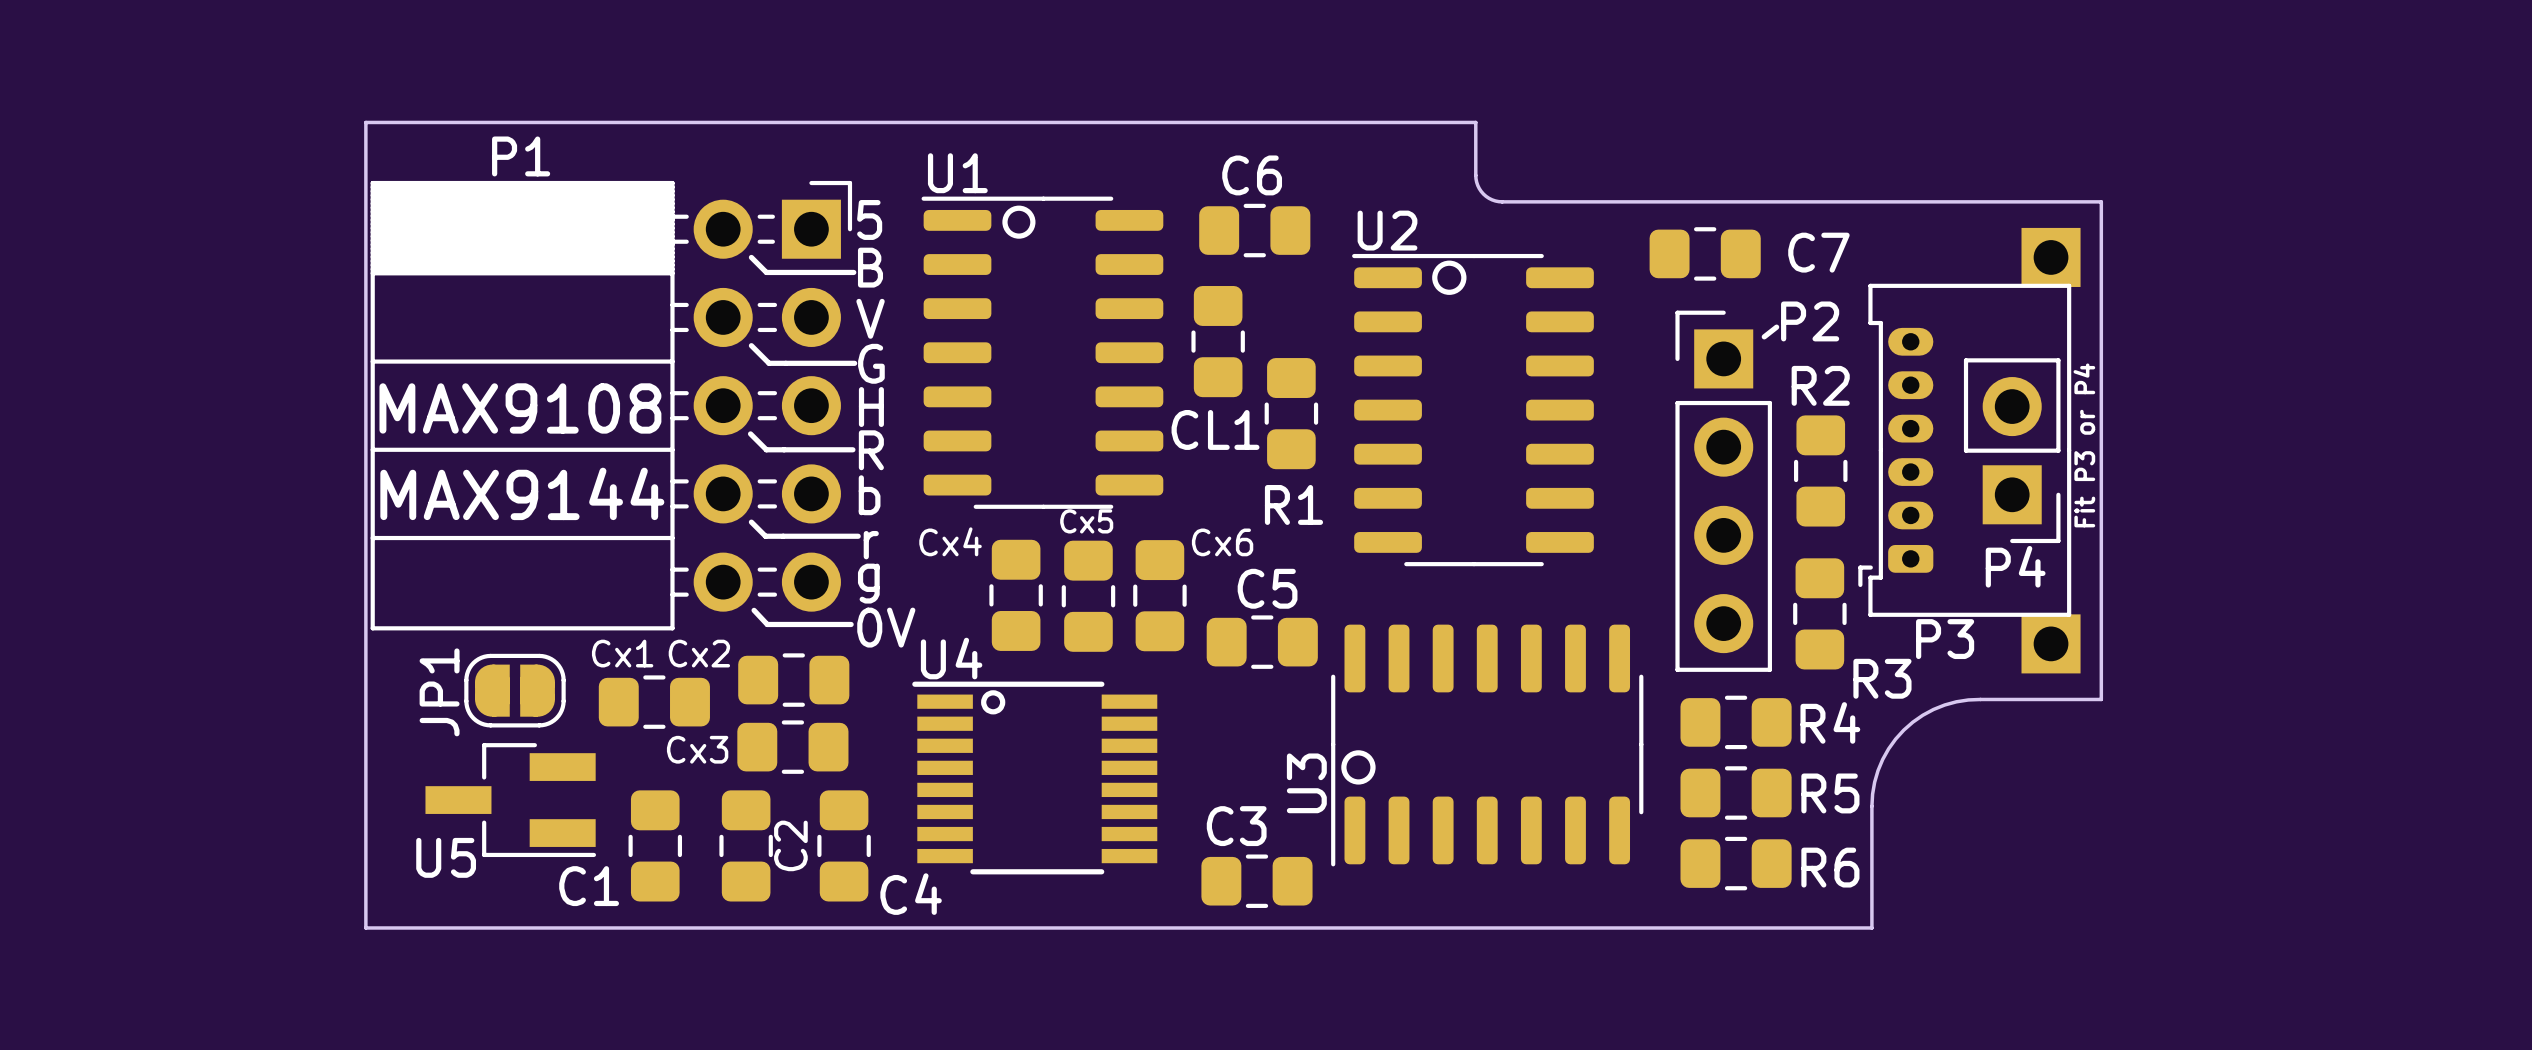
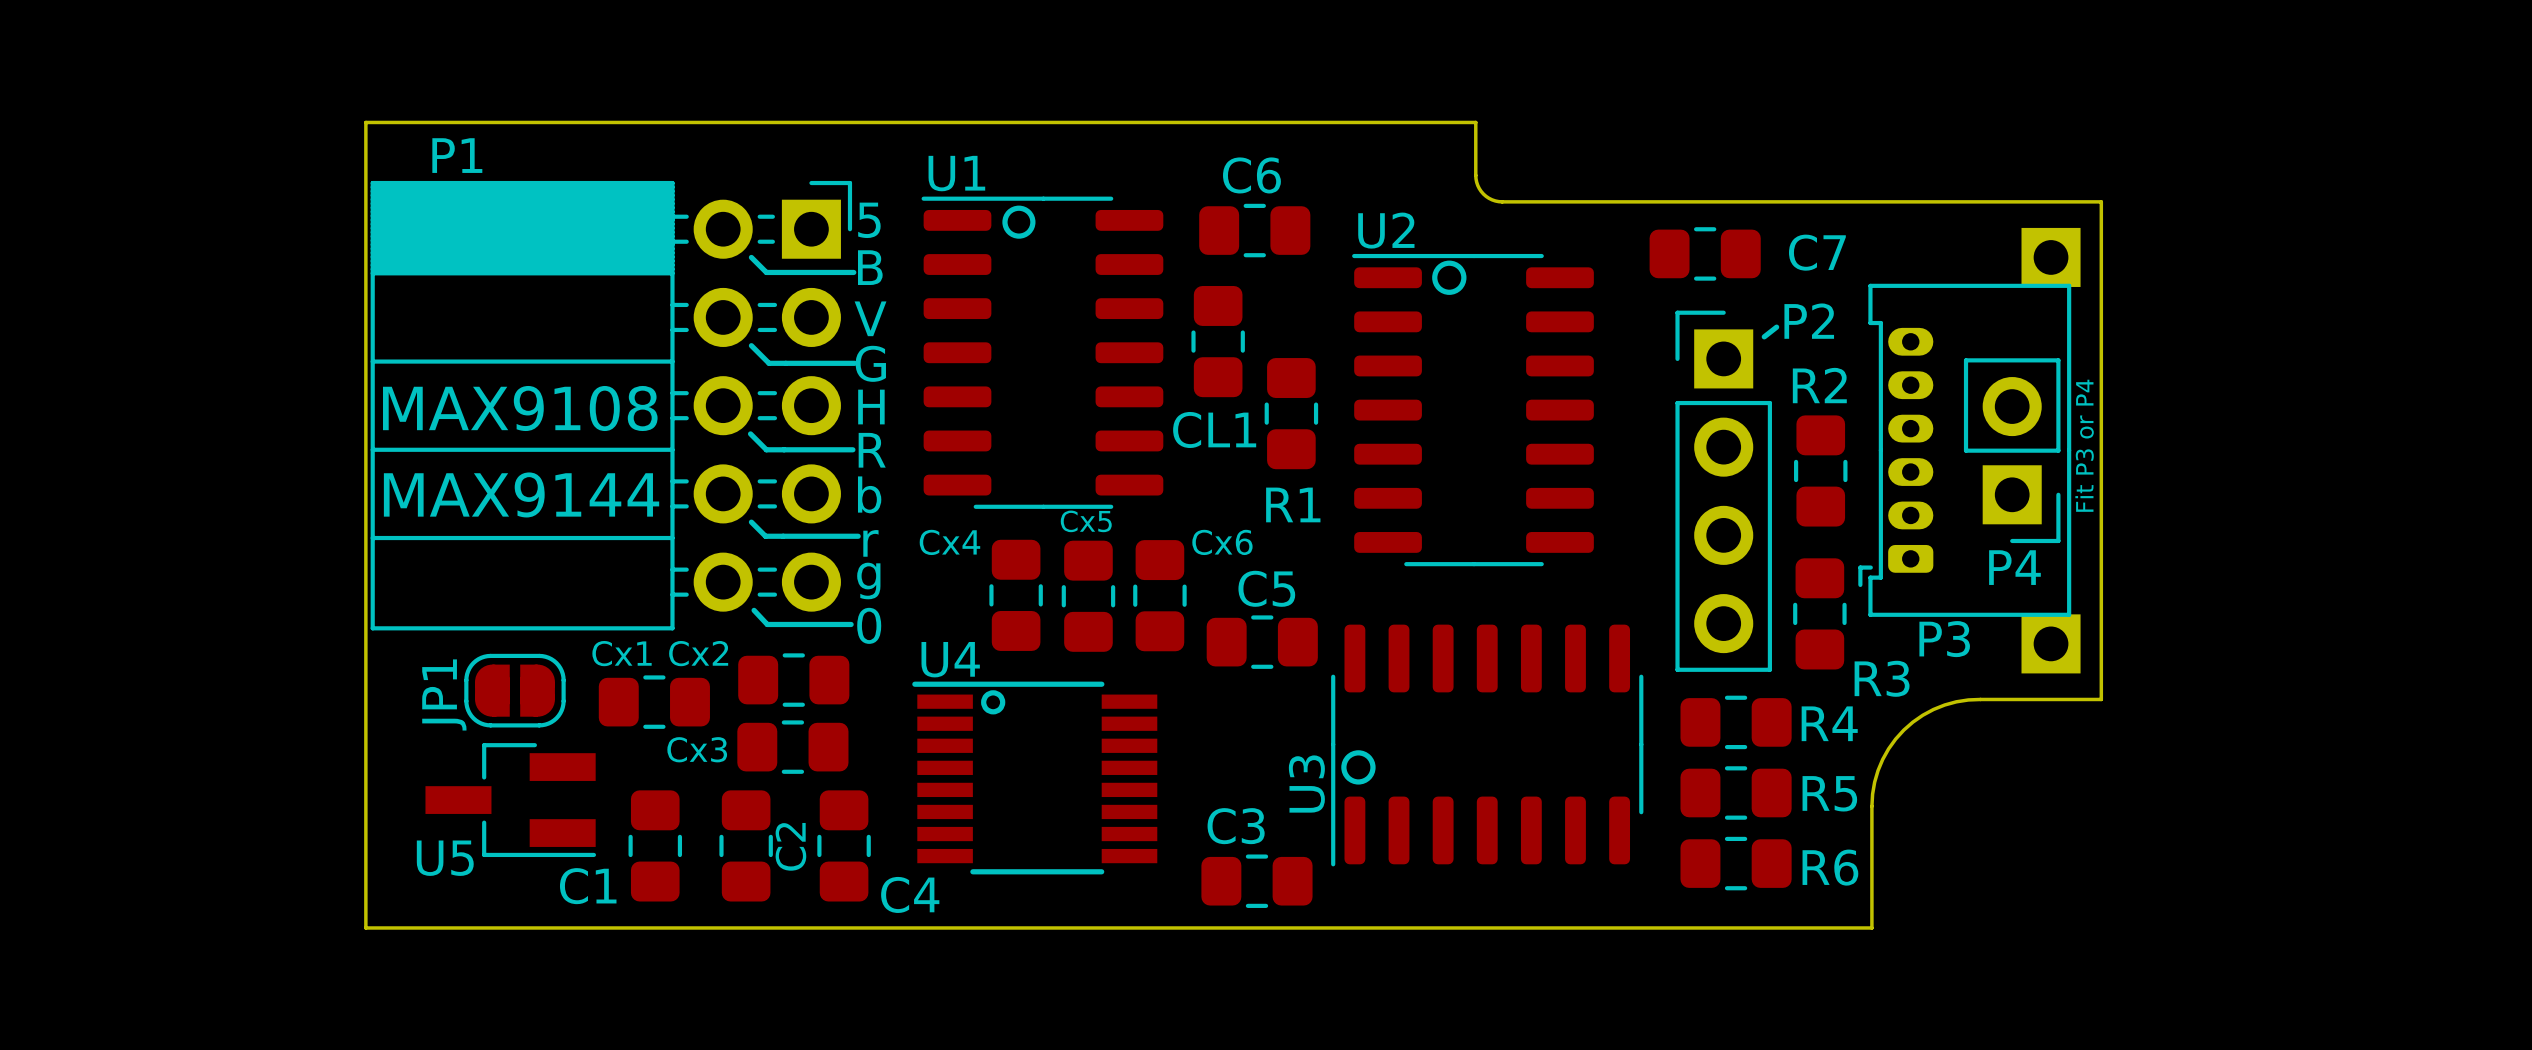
P1 name position: P1 (521, 156) -> P1 (457, 155)
text: 0V (886, 627) -> 0 (869, 625)

